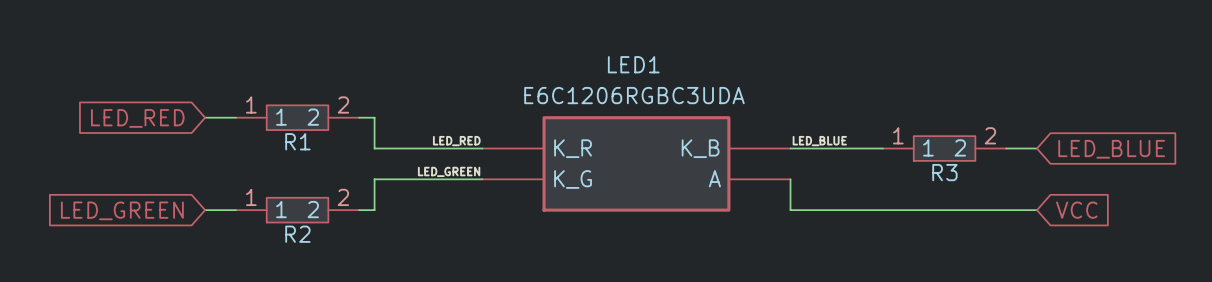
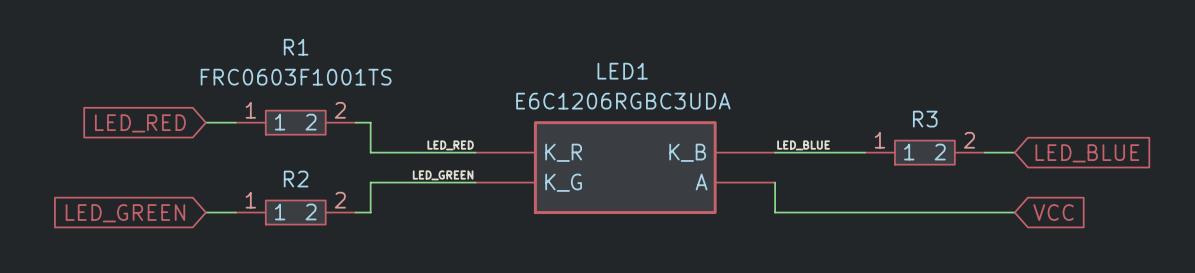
R1 value: none -> FRC0603F1001TS (296, 77)
R1 name position: R1 (297, 141) -> R1 (296, 47)
R3 name position: R3 (944, 172) -> R3 (925, 119)
R2 name position: R2 (297, 234) -> R2 (296, 179)

